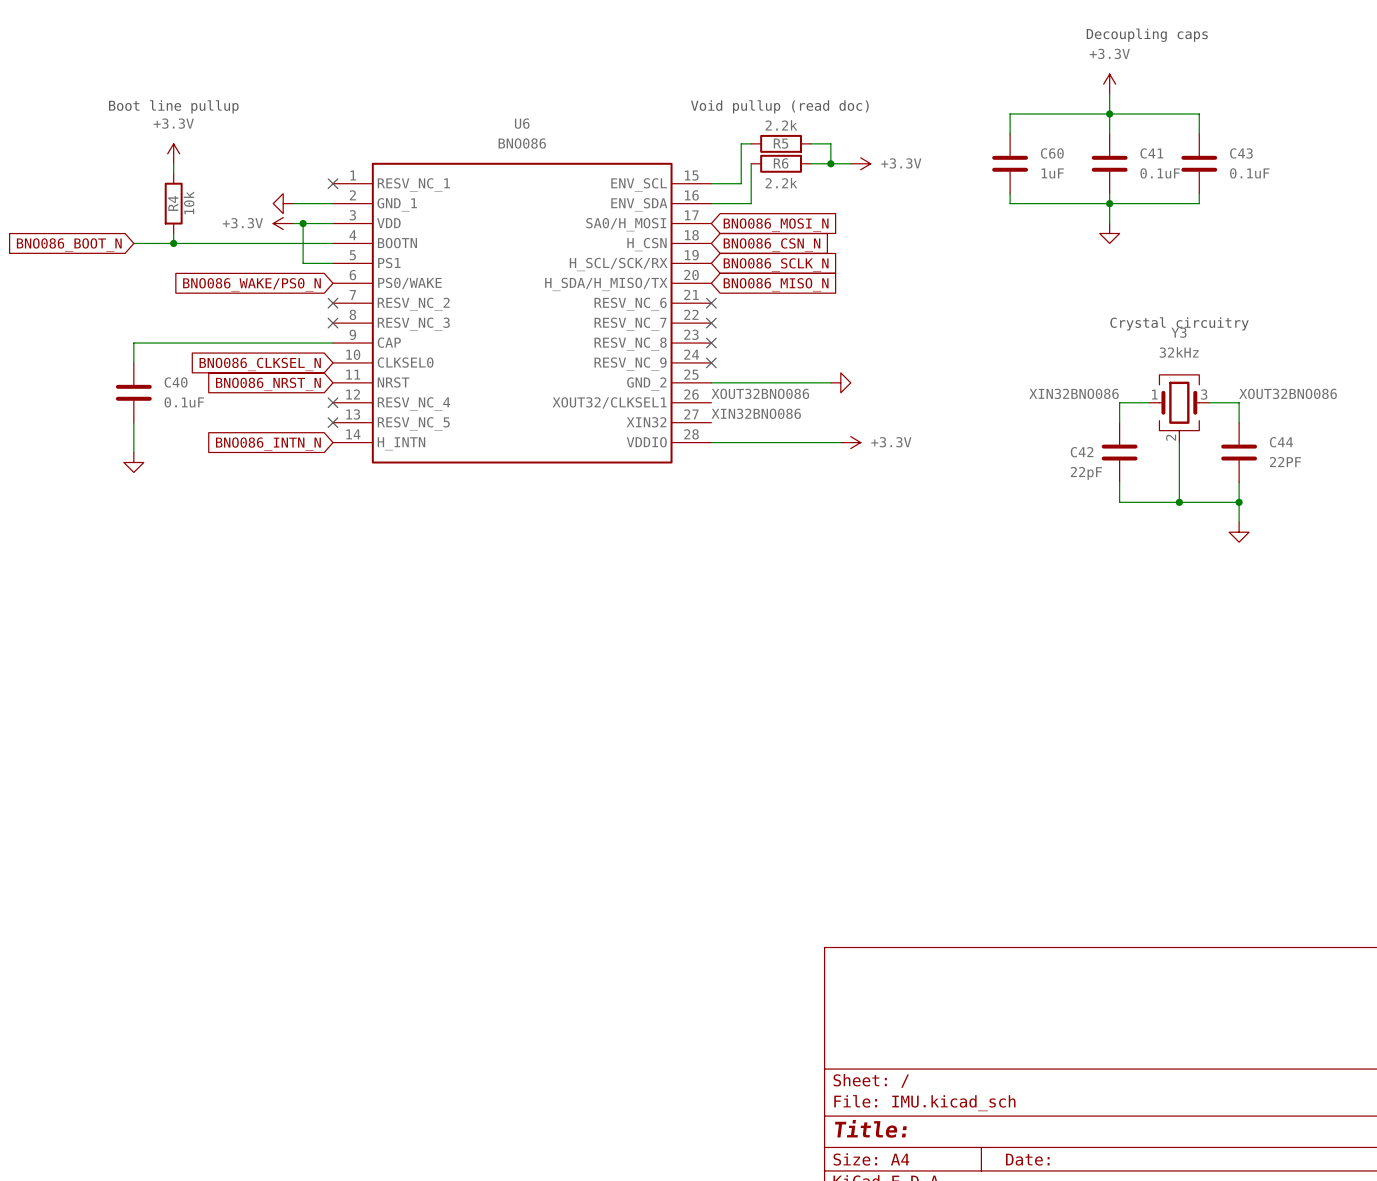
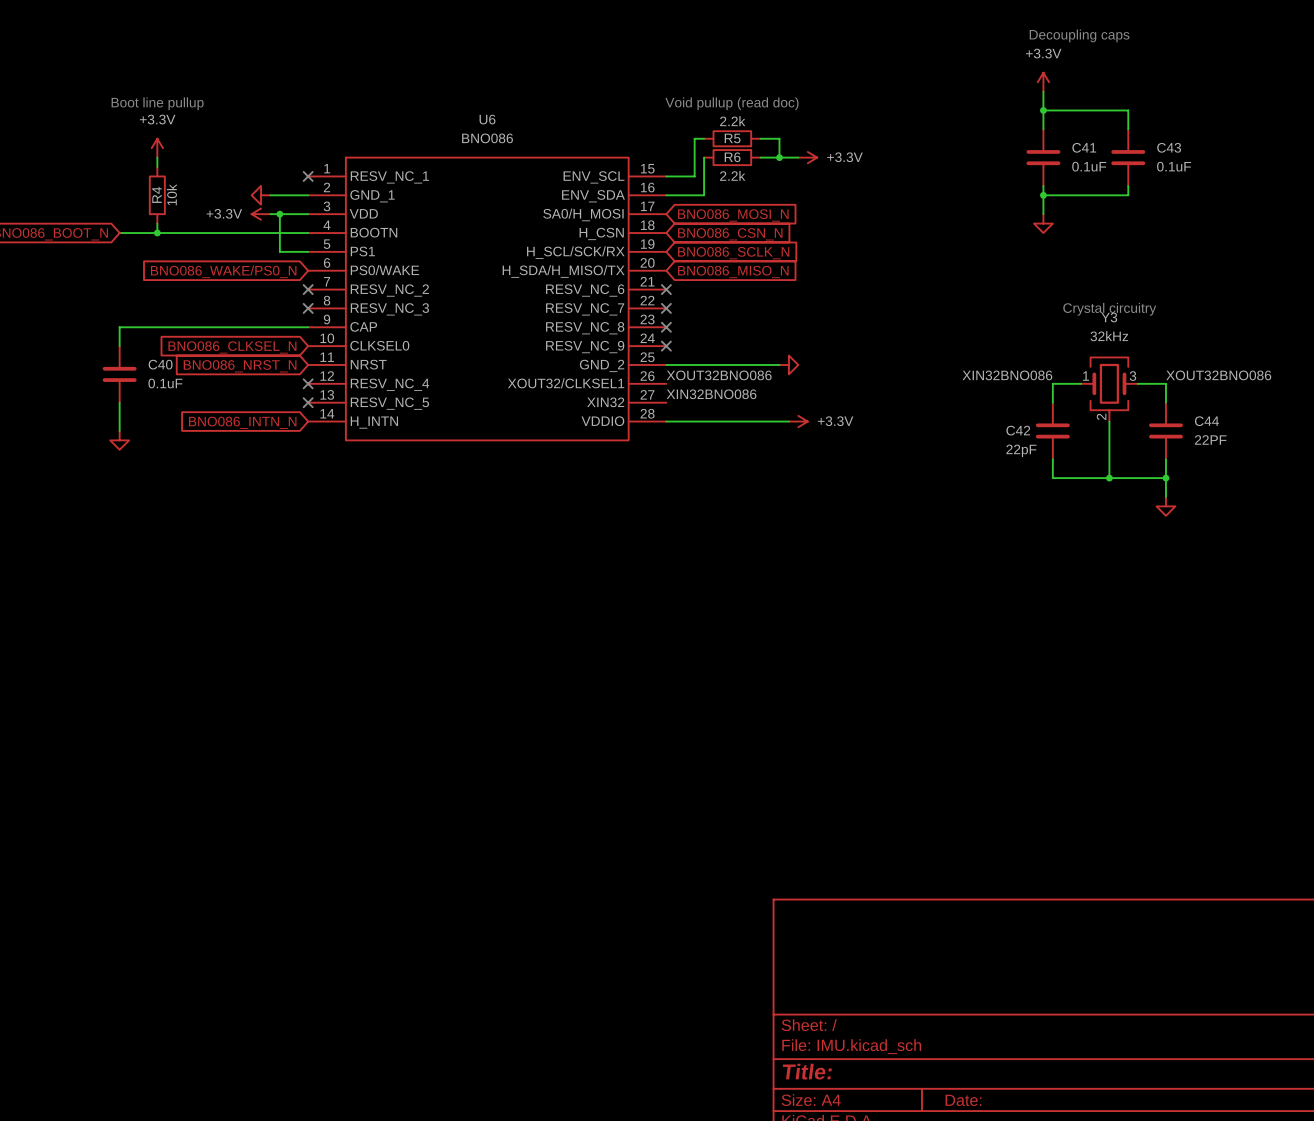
wire: (1109, 114) (1010, 114) (1010, 133) -> none
C60: 1uF (1010, 163) -> none
wire: (1010, 193) (1010, 203) (1109, 203) -> none

